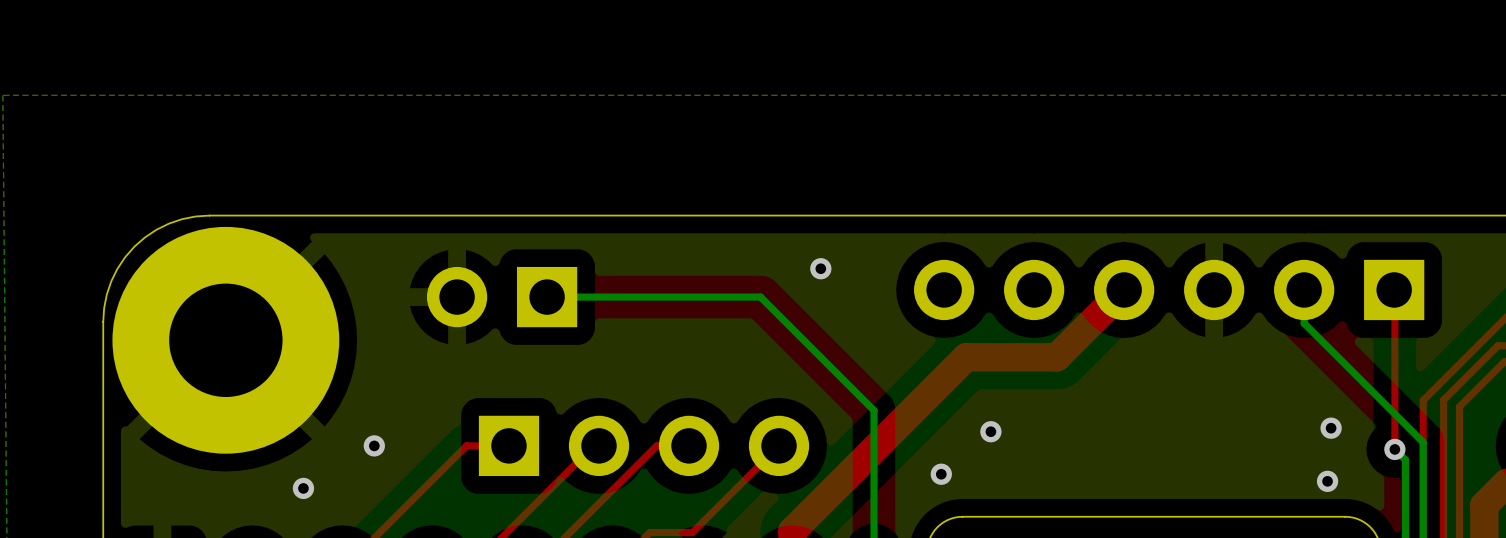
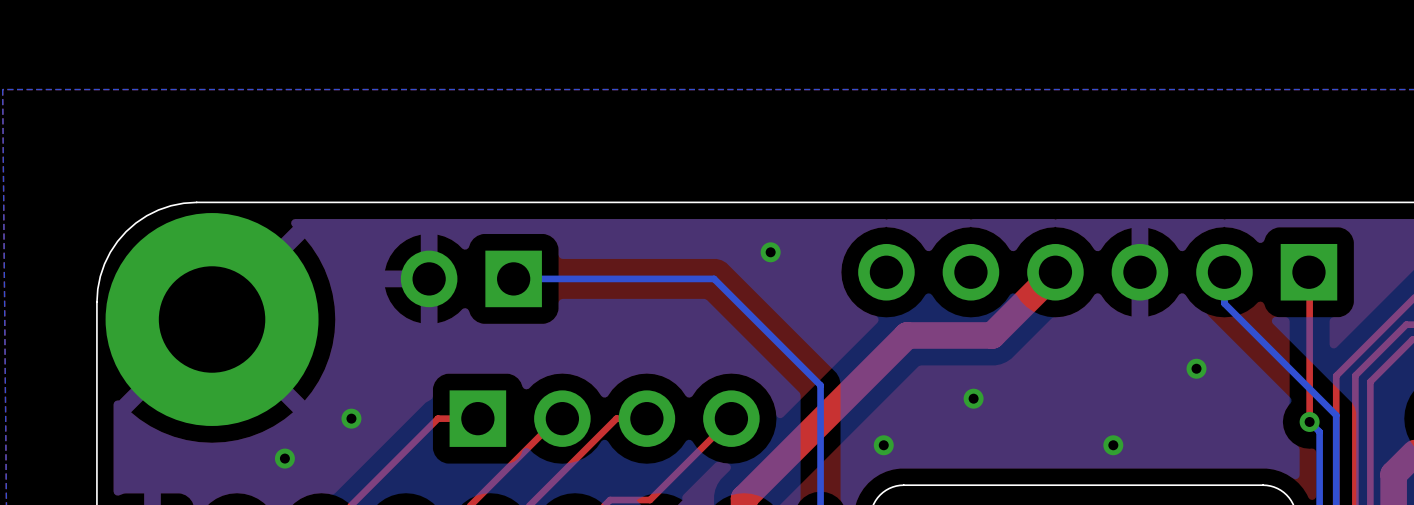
via: none -> (1196, 368)
via: (1331, 428) -> none
via position: (990, 431) -> (973, 398)
via: none -> (1113, 445)
via: (1327, 481) -> none

